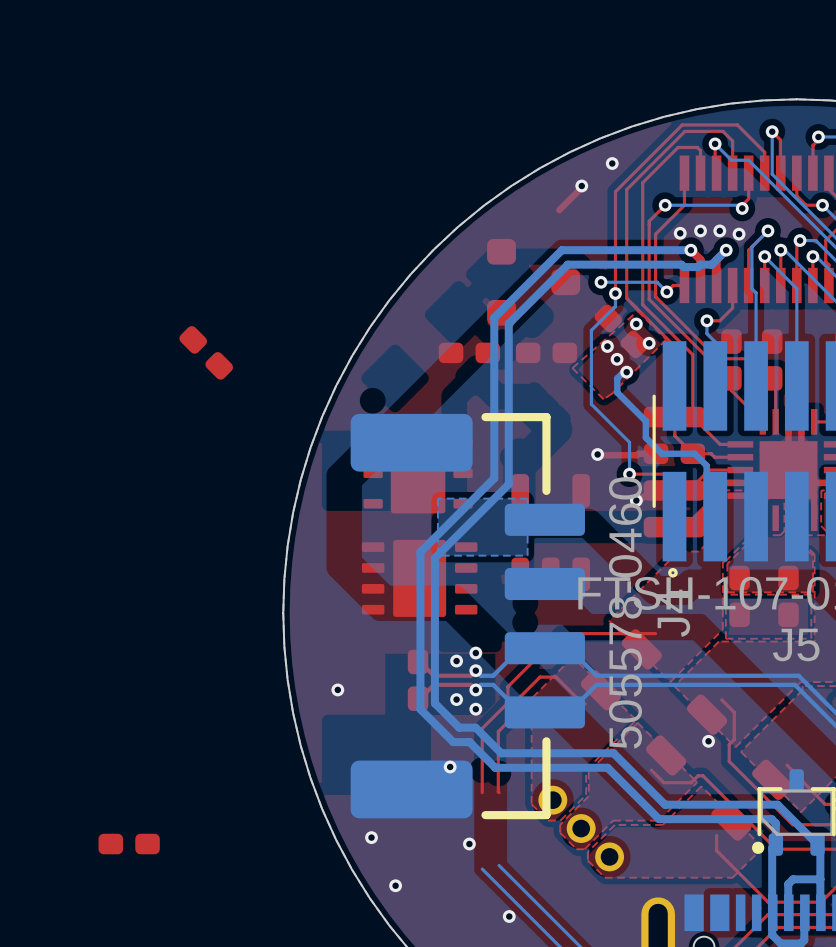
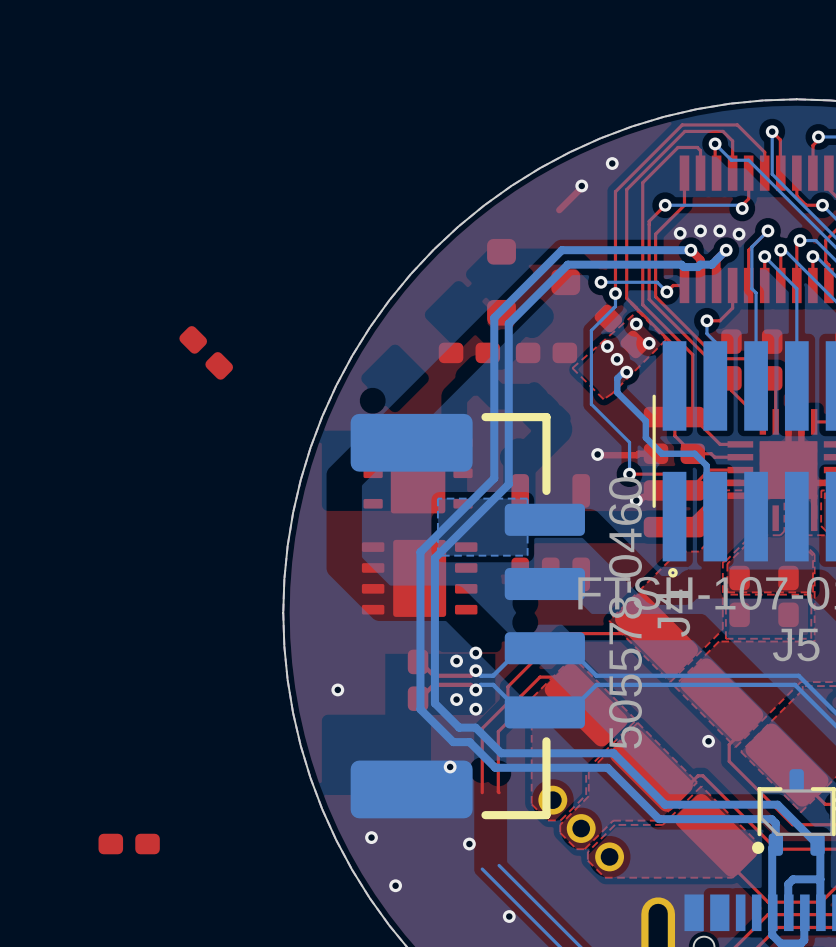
part footprint: [580, 629, 662, 711] -> [544, 593, 699, 747]
part footprint: [646, 694, 728, 776] -> [609, 658, 764, 812]
part footprint: [711, 759, 793, 841] -> [675, 723, 829, 877]

